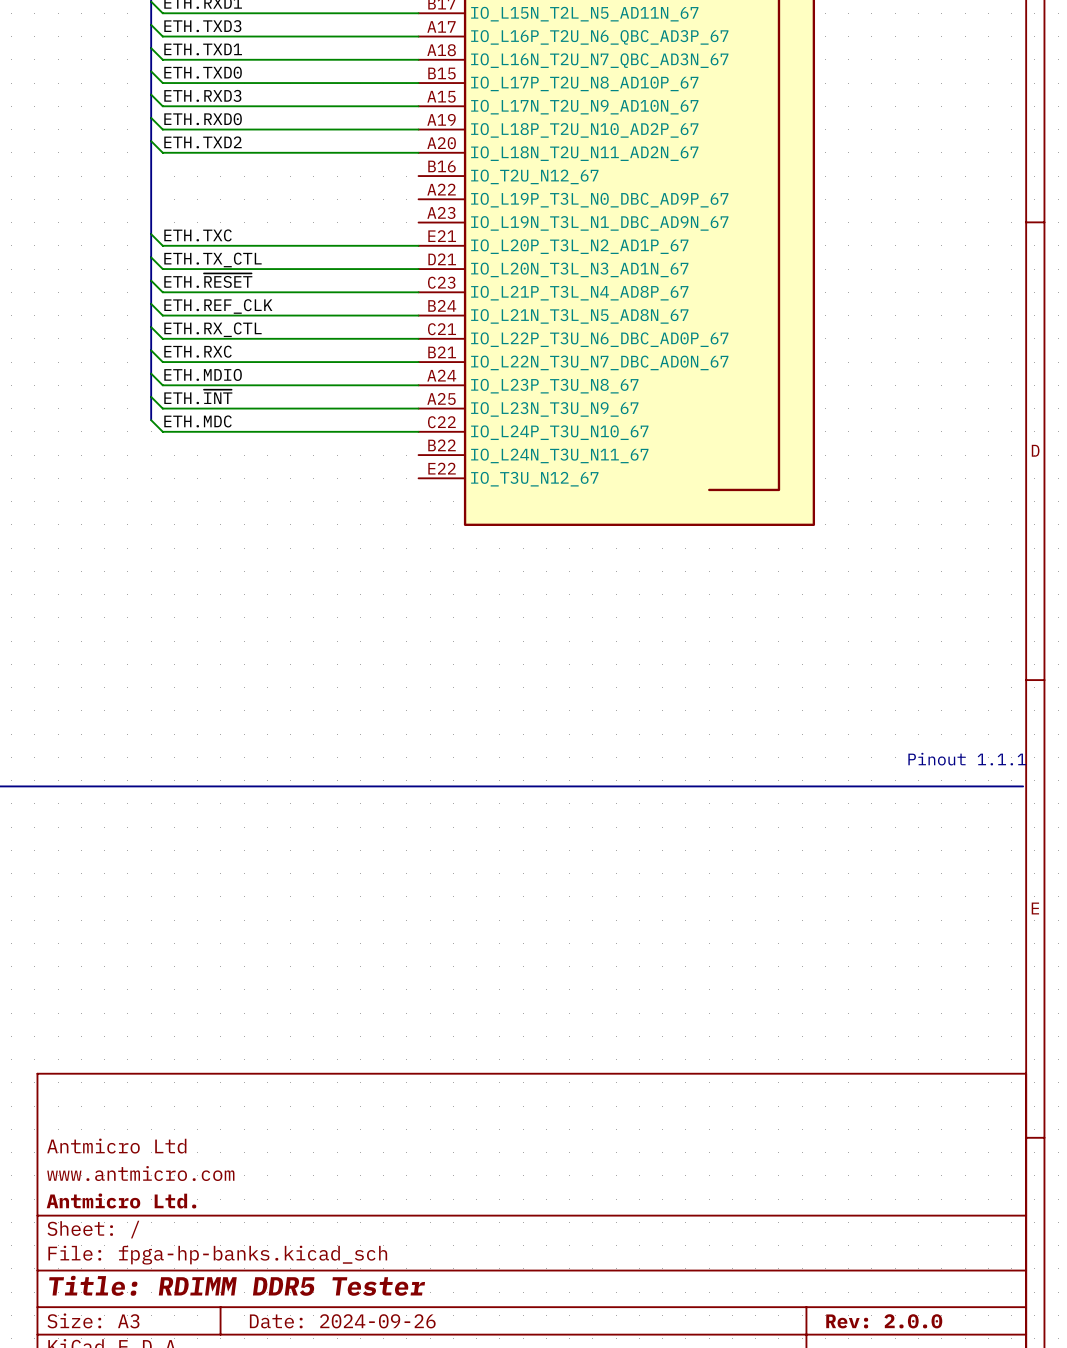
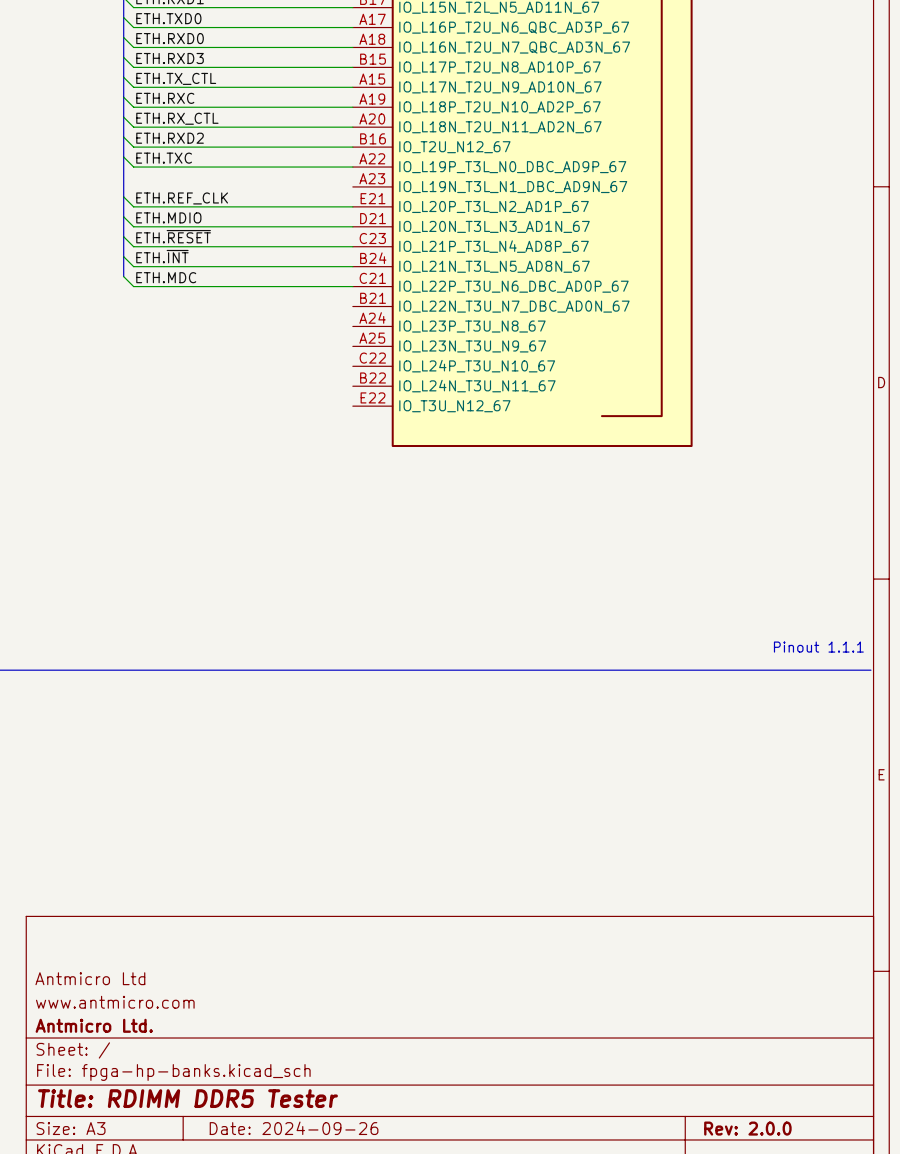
label: ETH.TXD3 (202, 26) -> ETH.TXD0 (168, 18)
label: ETH.TXD1 (203, 49) -> ETH.RXD0 (170, 38)
label: ETH.TXD0 (203, 72) -> ETH.RXD3 (170, 58)
label: ETH.RXD3 (202, 95) -> ETH.TX_CTL (176, 78)
label: ETH.RXD0 (203, 119) -> ETH.RXC (165, 98)
label: ETH.TXD2 (202, 142) -> ETH.RX_CTL (177, 118)
label: none -> ETH.RXD2 (170, 138)
label: none -> ETH.TXC (164, 158)
label: ETH.TXC (198, 235) -> ETH.REF_CLK (182, 198)
label: ETH.TX_CTL (212, 259) -> ETH.MDIO (168, 217)
label: ETH.REF_CLK (218, 306) -> ETH.~{INT} (162, 256)
bus: (151, 327) (151, 420) -> none
label: ETH.RX_CTL (212, 329) -> ETH.MDC (166, 277)
wire: (151, 350) (162, 362) (418, 362) -> (123, 137) (133, 147) (352, 147)
label: ETH.RXC (198, 351) -> none
wire: (151, 373) (162, 385) (418, 385) -> (123, 157) (133, 167) (352, 167)
label: ETH.MDIO (203, 374) -> none
wire: (151, 396) (162, 408) (418, 408) -> none
label: ETH.~{INT} (198, 396) -> none
wire: (151, 420) (162, 431) (418, 431) -> none
label: ETH.MDC (198, 421) -> none

